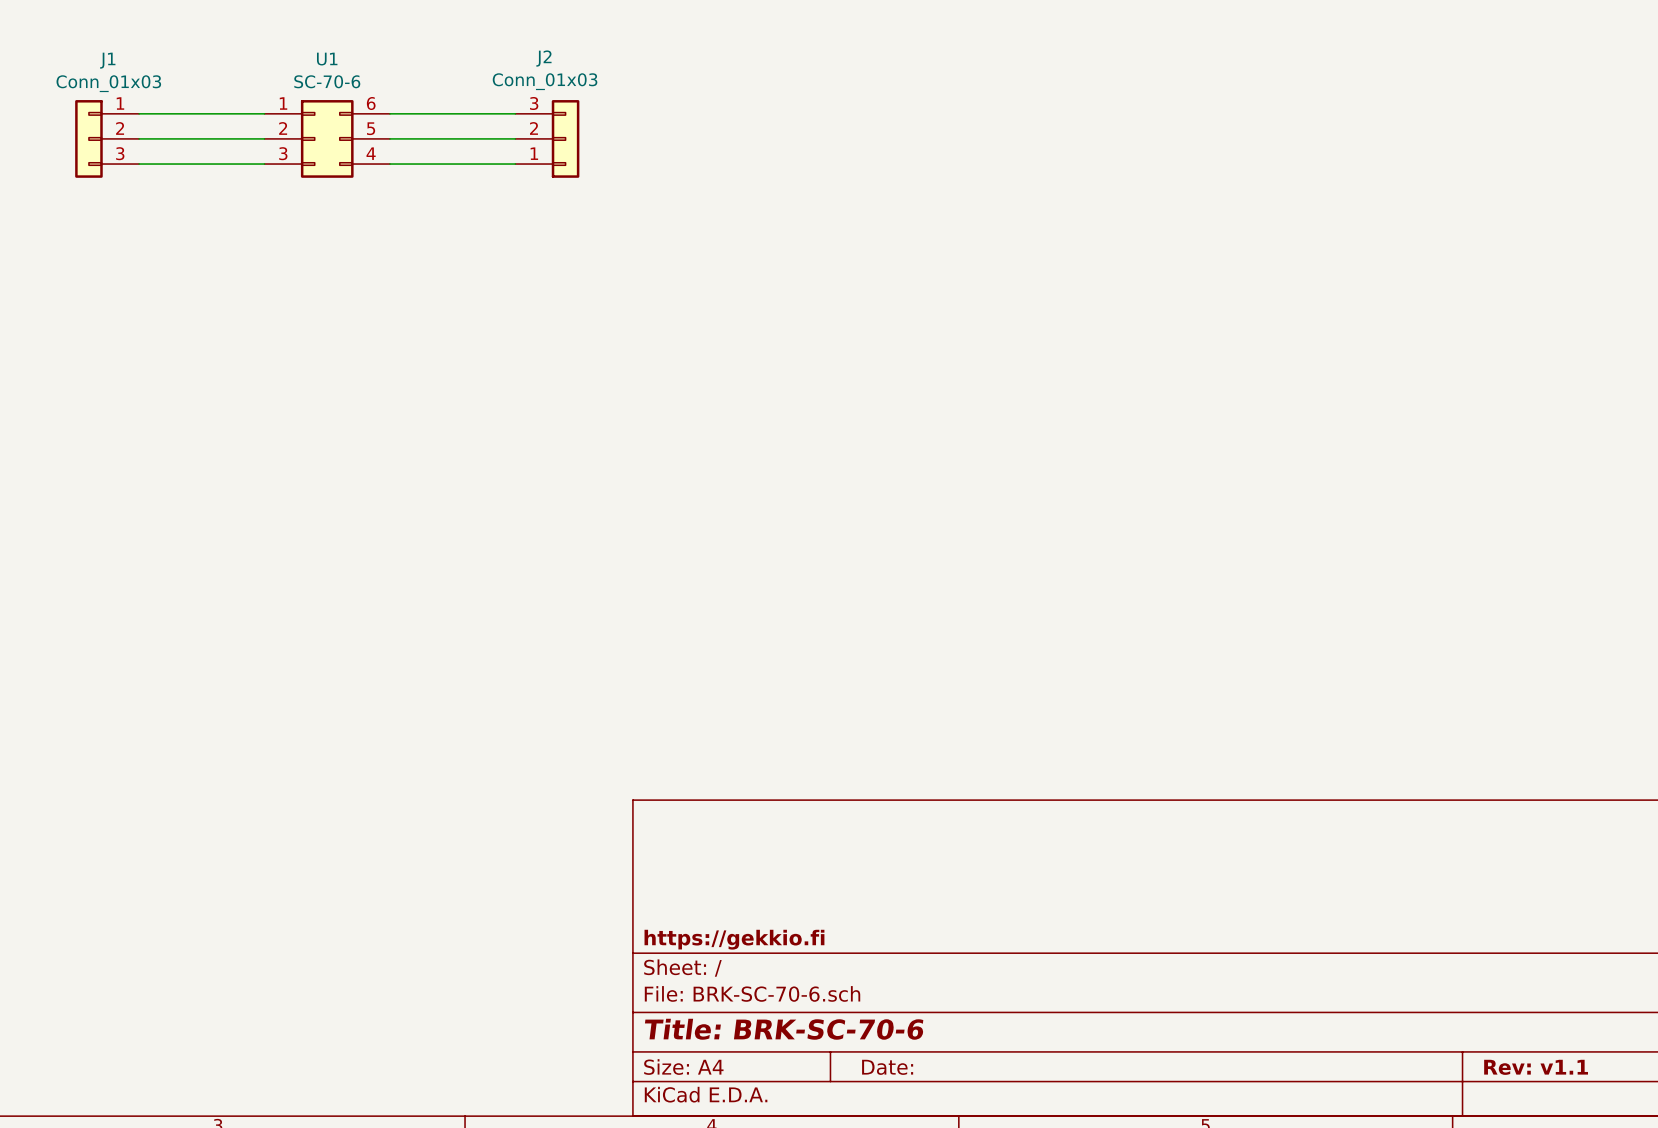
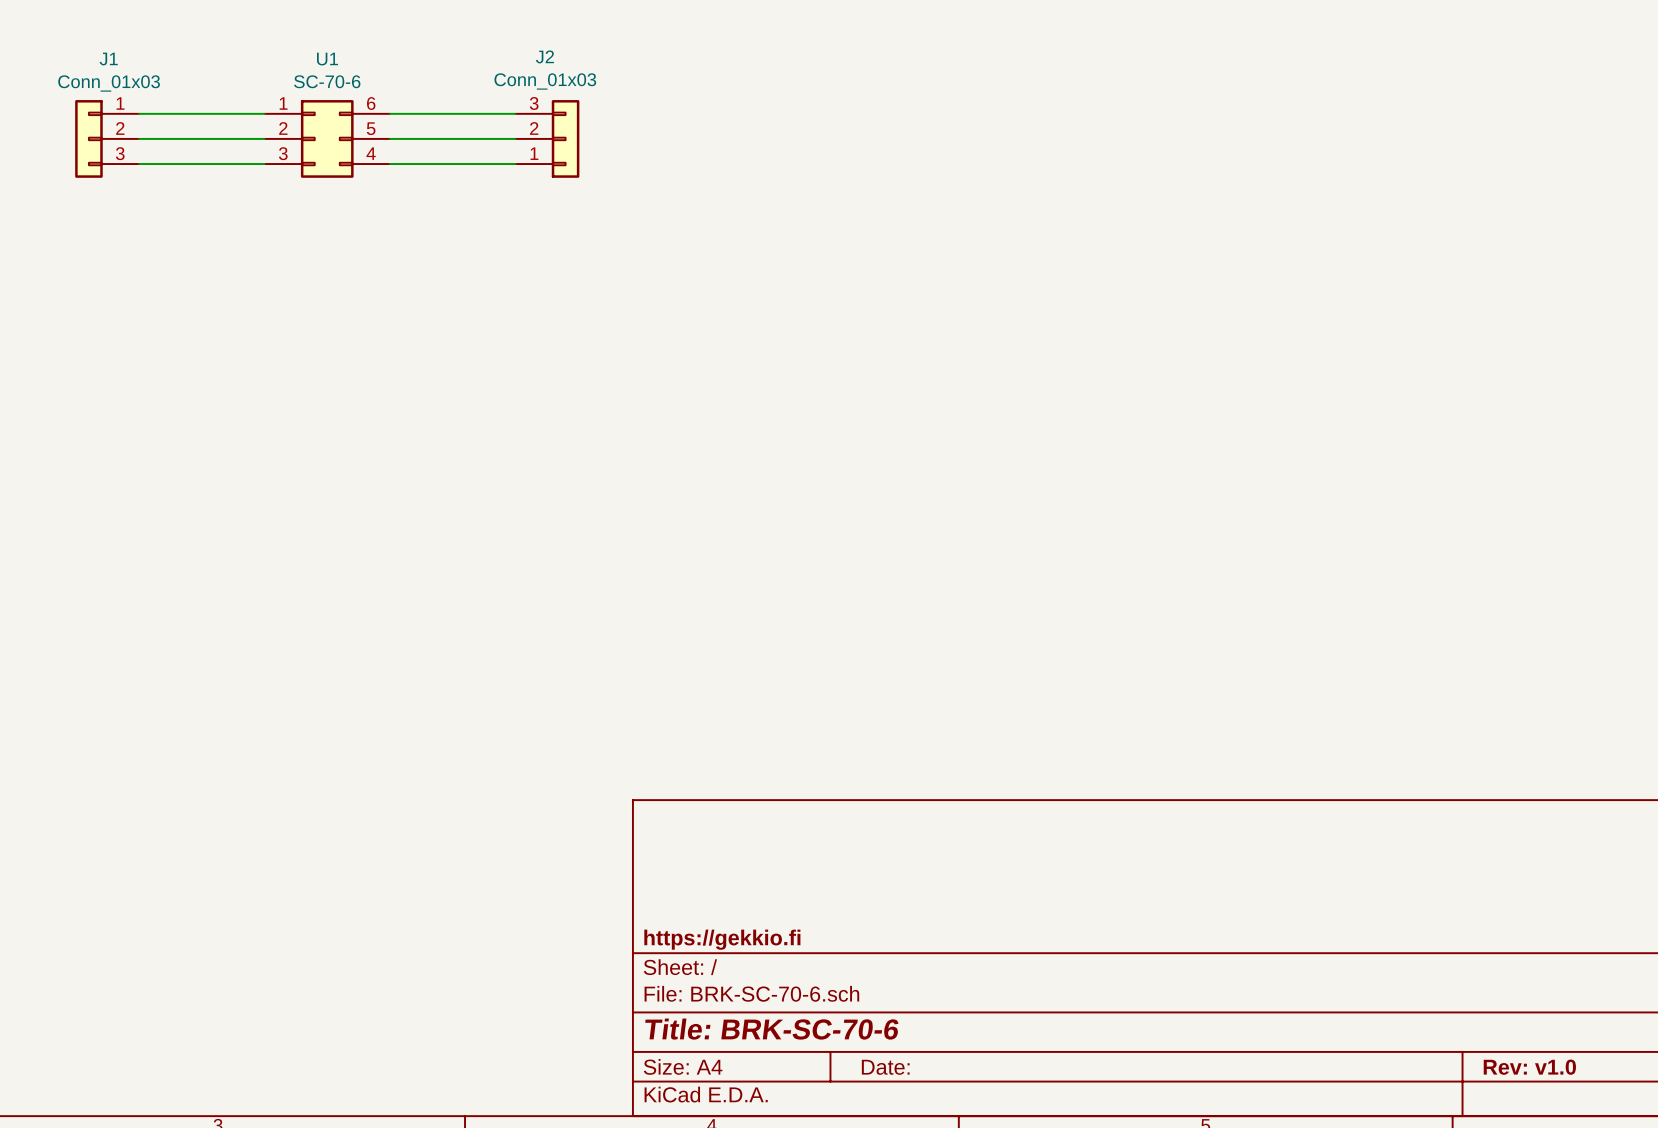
title block: Rev: v1.1 (1536, 1067) -> Rev: v1.0 (1529, 1067)

